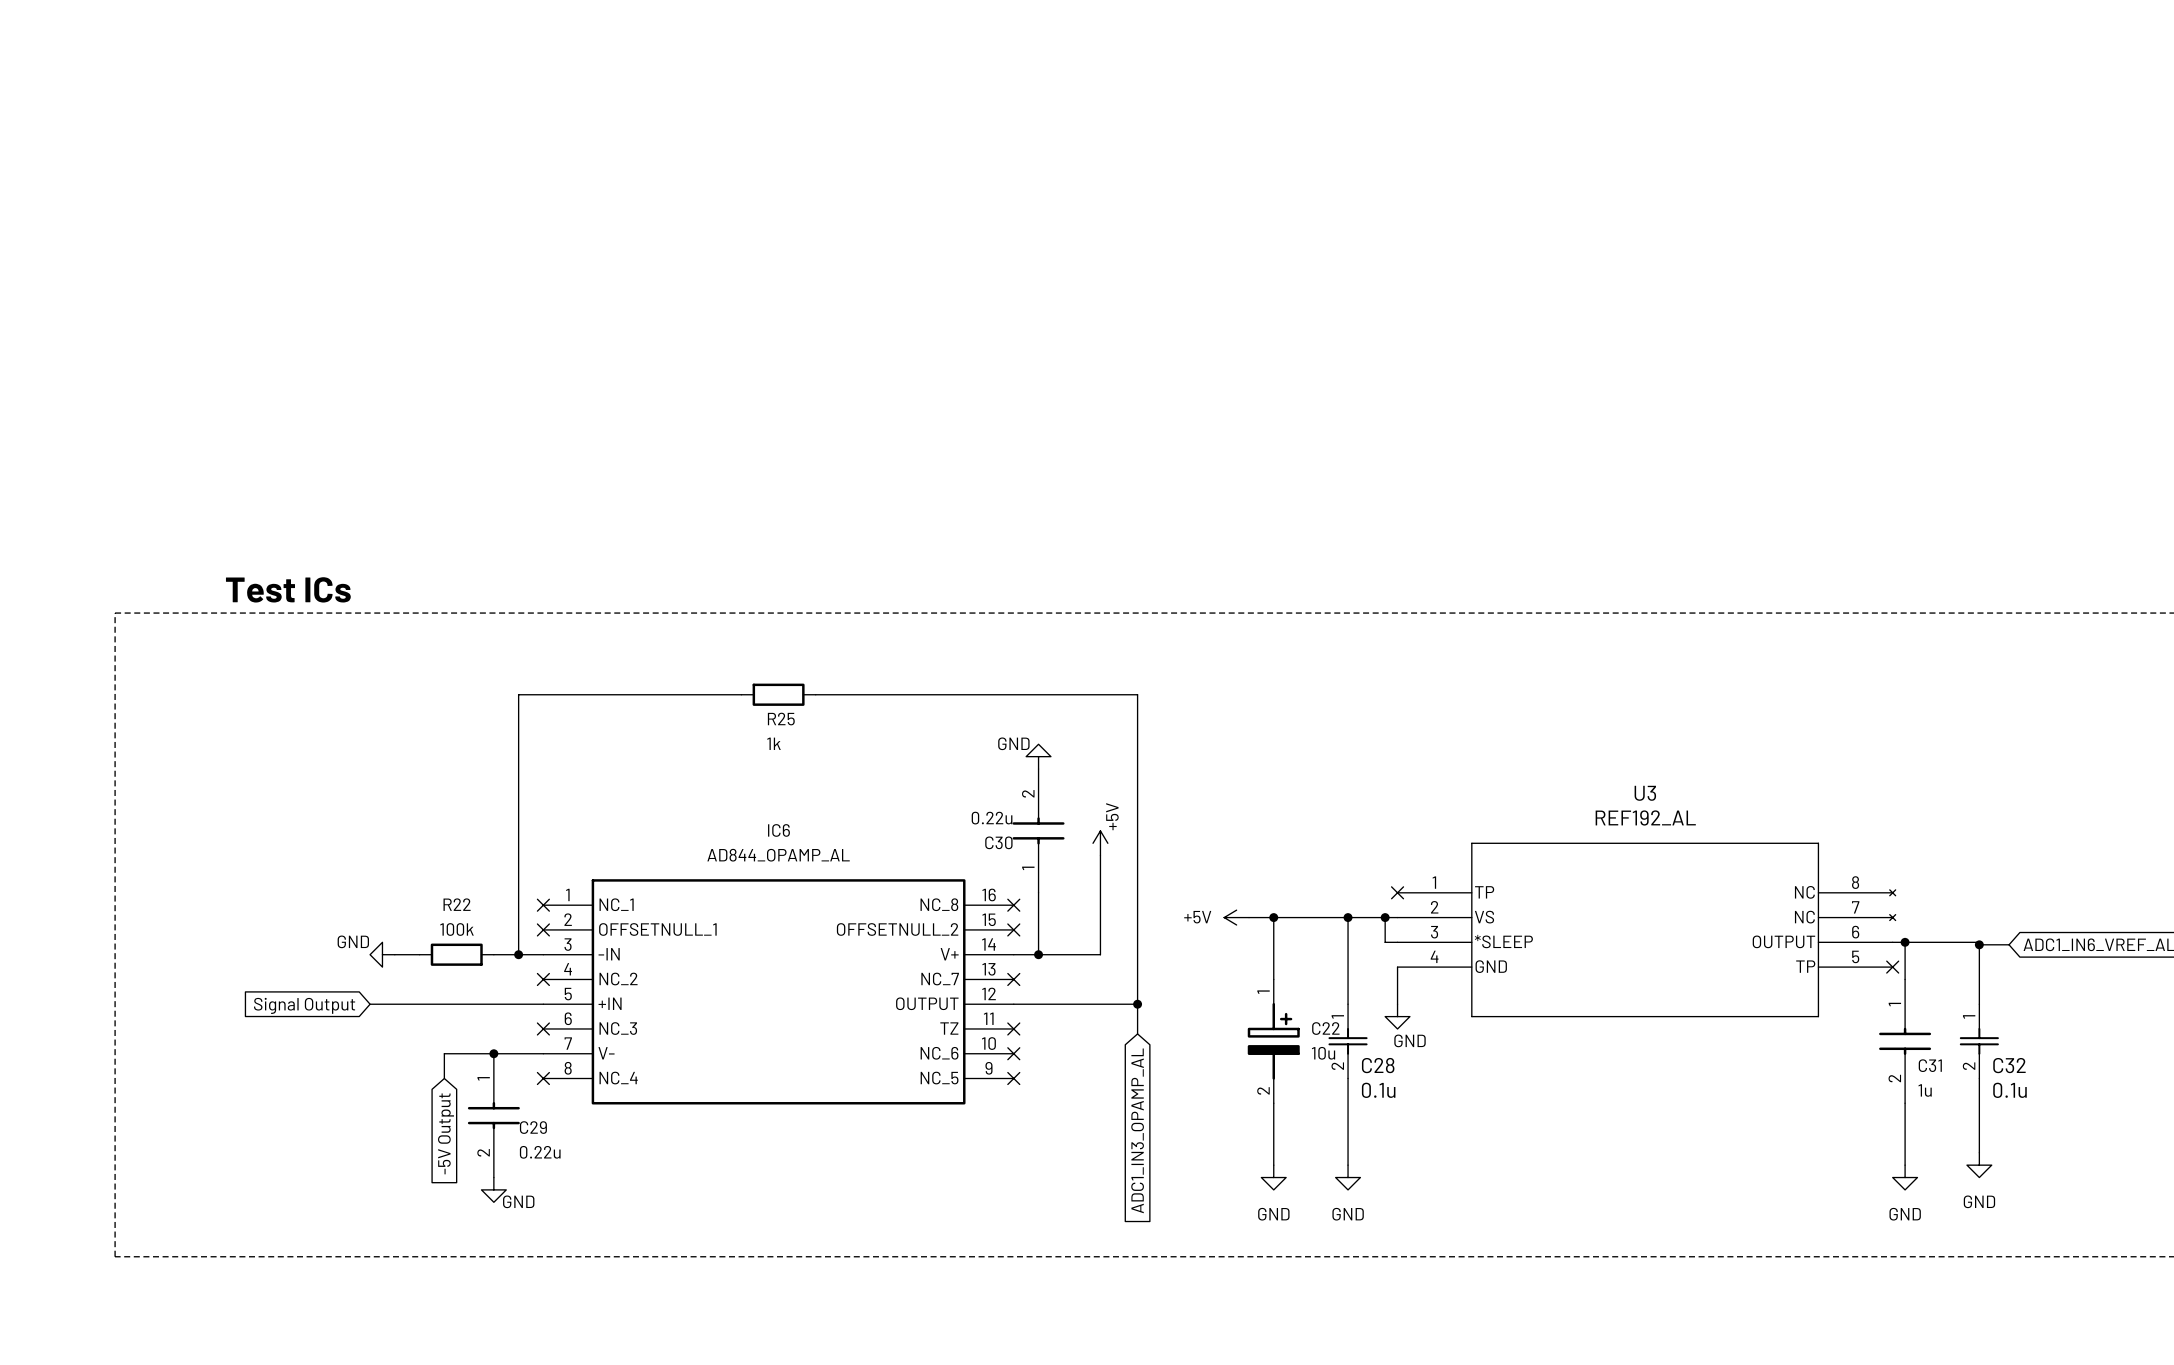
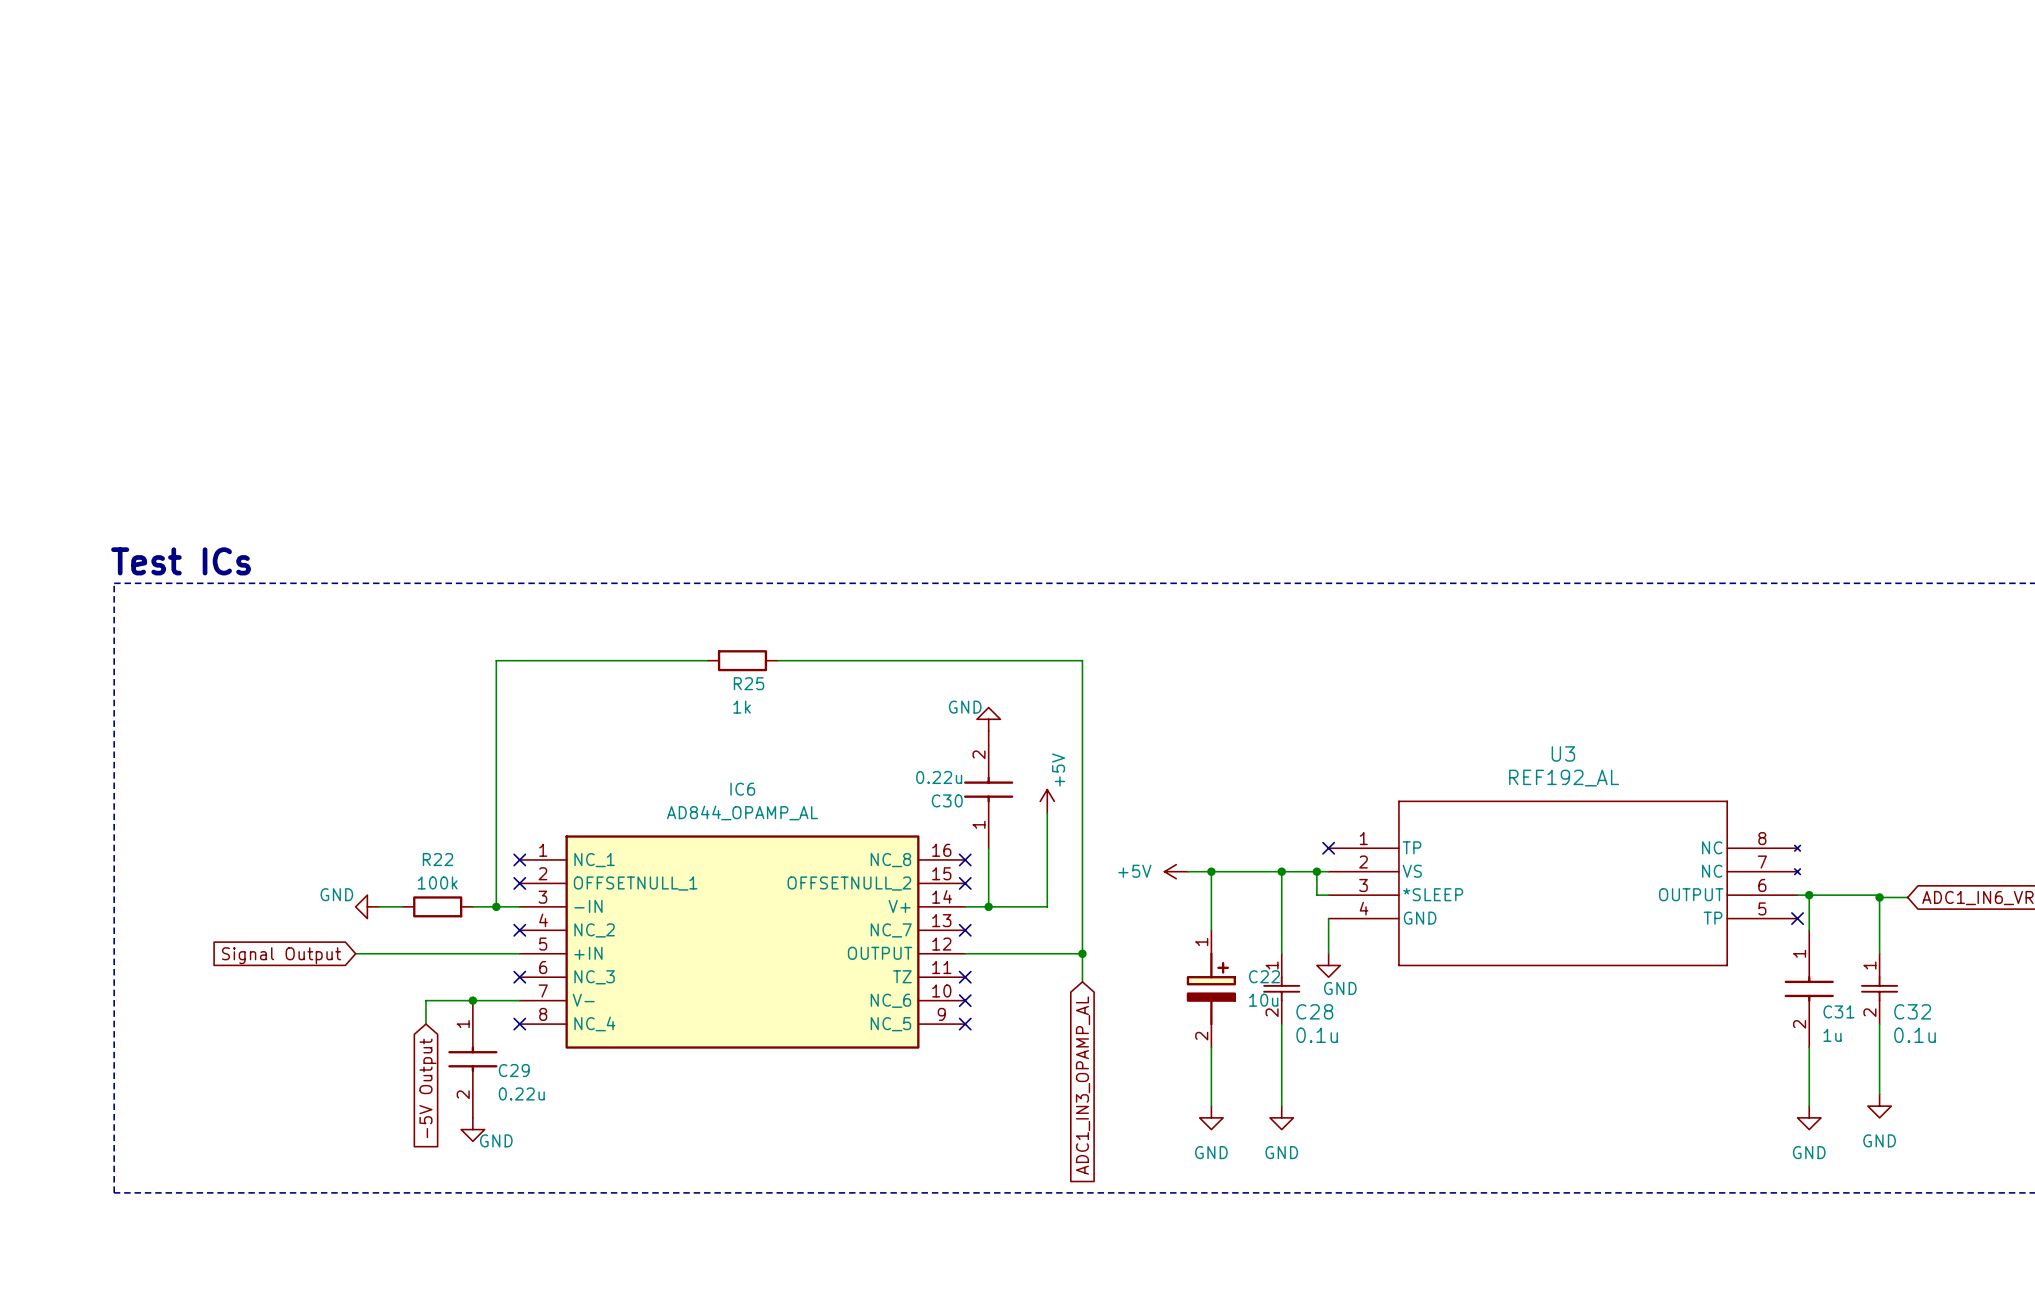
text position: Test ICs (288, 589) -> Test ICs (181, 561)

